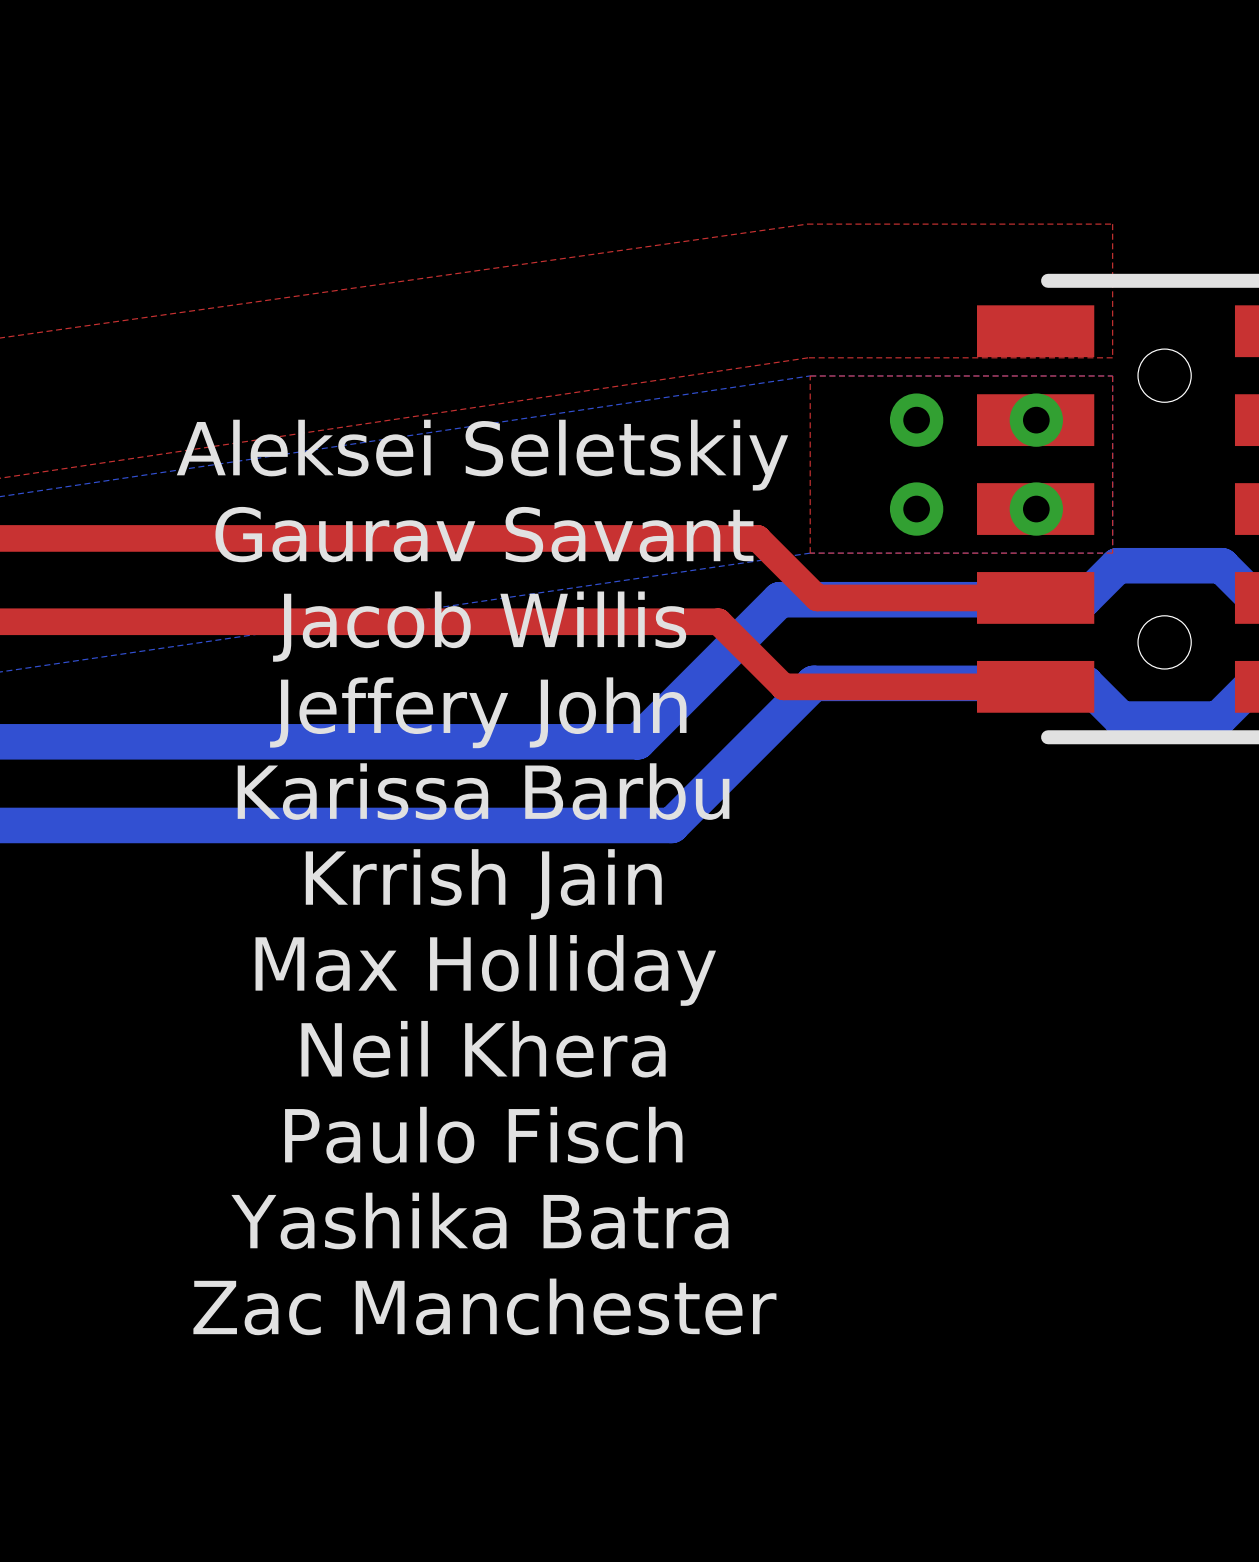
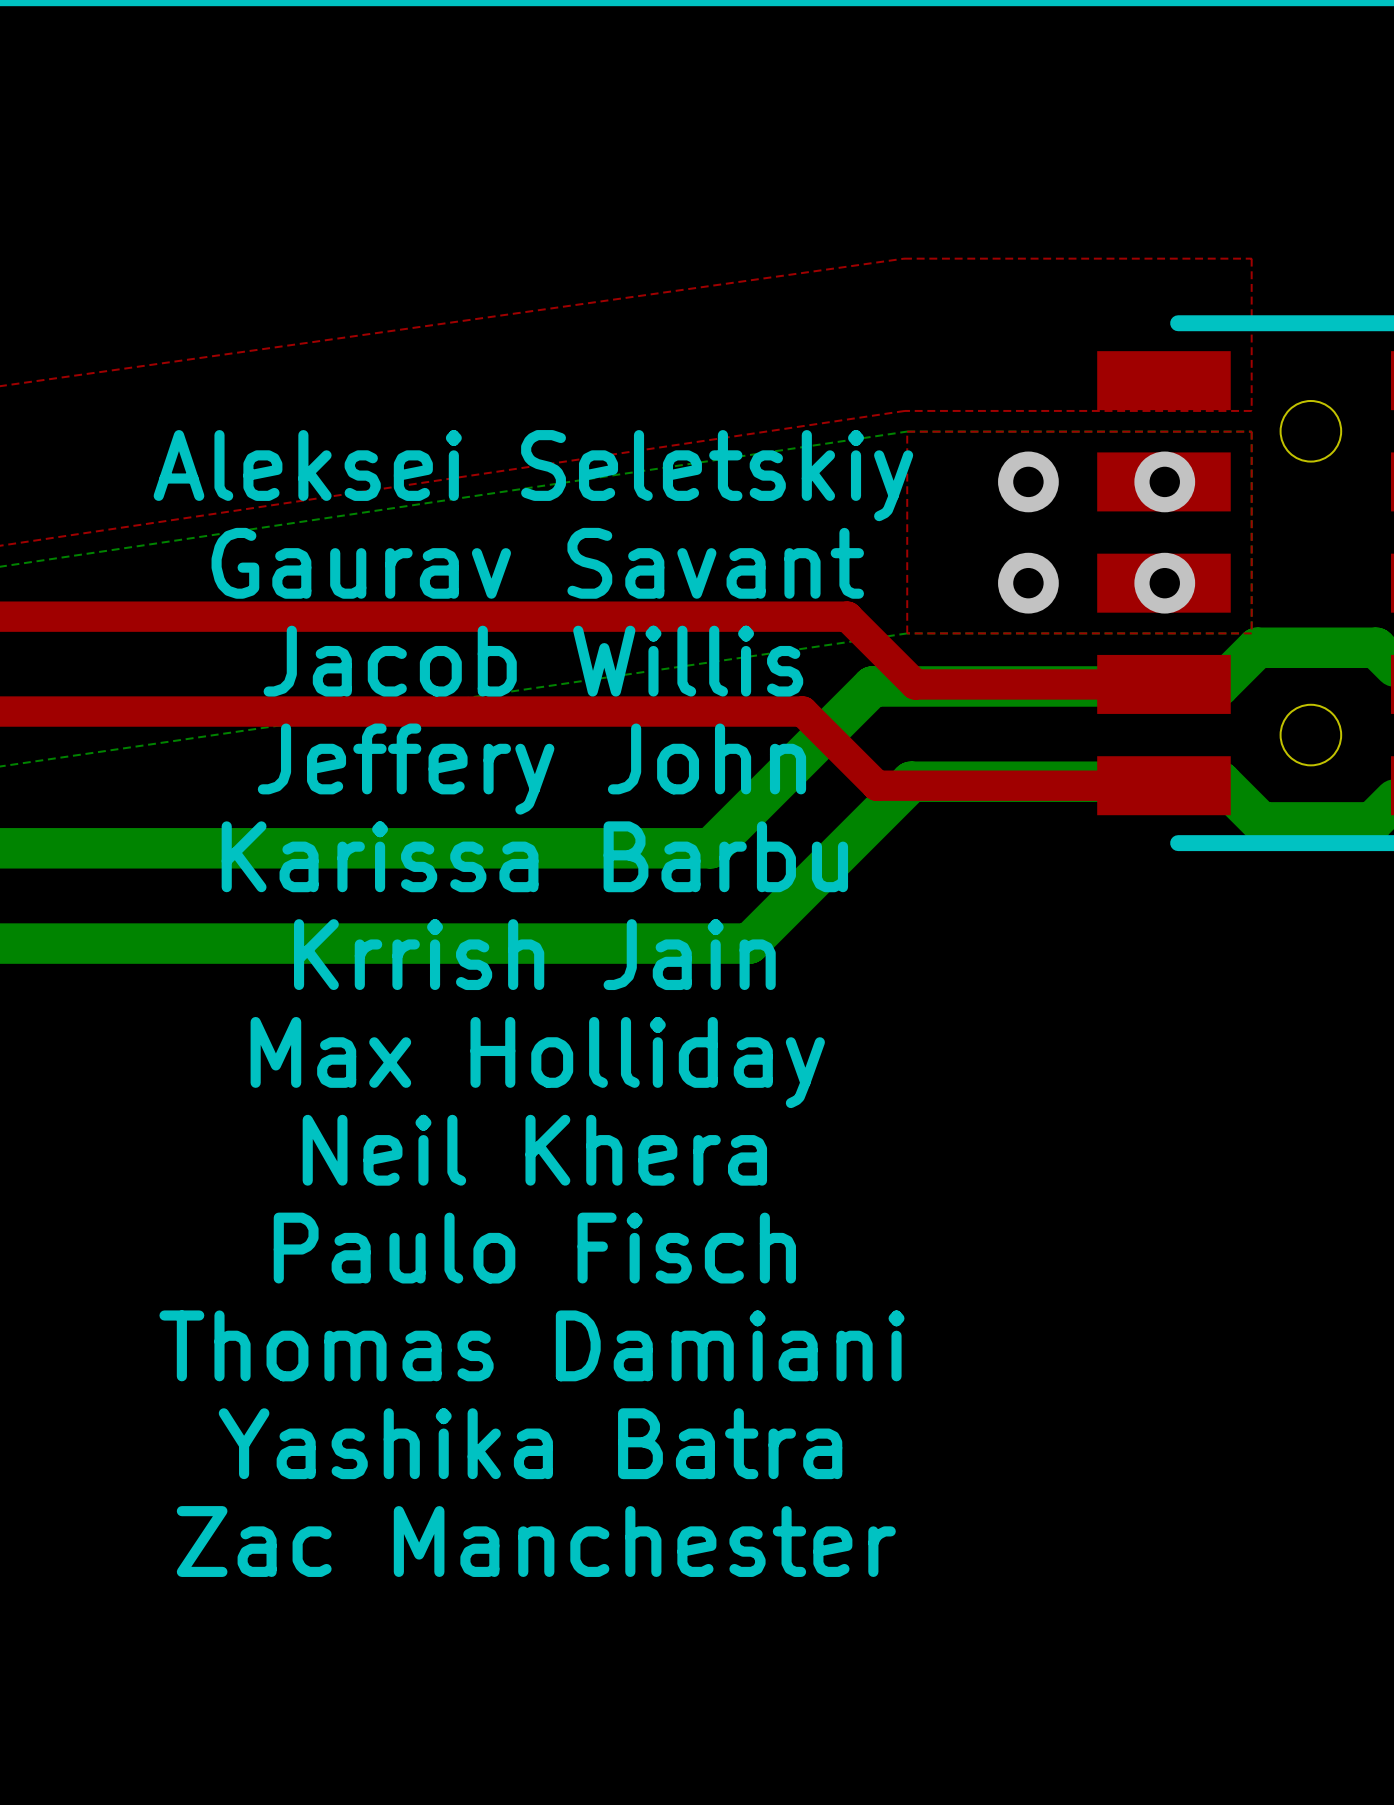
text position: Aleksei Seletskiy (482, 455) -> Aleksei Seletskiy (533, 475)
text position: Gaurav Savant (484, 534) -> Gaurav Savant (537, 563)
text position: Jacob Willis (479, 626) -> Jacob Willis (533, 661)
text position: Jeffery John (478, 712) -> Jeffery John (531, 769)
text position: Karissa Barbu (483, 791) -> Karissa Barbu (534, 856)
text position: Krrish Jain (483, 884) -> Krrish Jain (534, 954)
text position: Max Holliday (485, 970) -> Max Holliday (537, 1062)
text position: Neil Khera (483, 1049) -> Neil Khera (534, 1150)
text position: Paulo Fisch (483, 1135) -> Paulo Fisch (534, 1248)
text: none -> Thomas Damiani (531, 1345)
text position: Yashika Batra (479, 1221) -> Yashika Batra (530, 1443)
text position: Zac Manchester (484, 1306) -> Zac Manchester (536, 1541)

